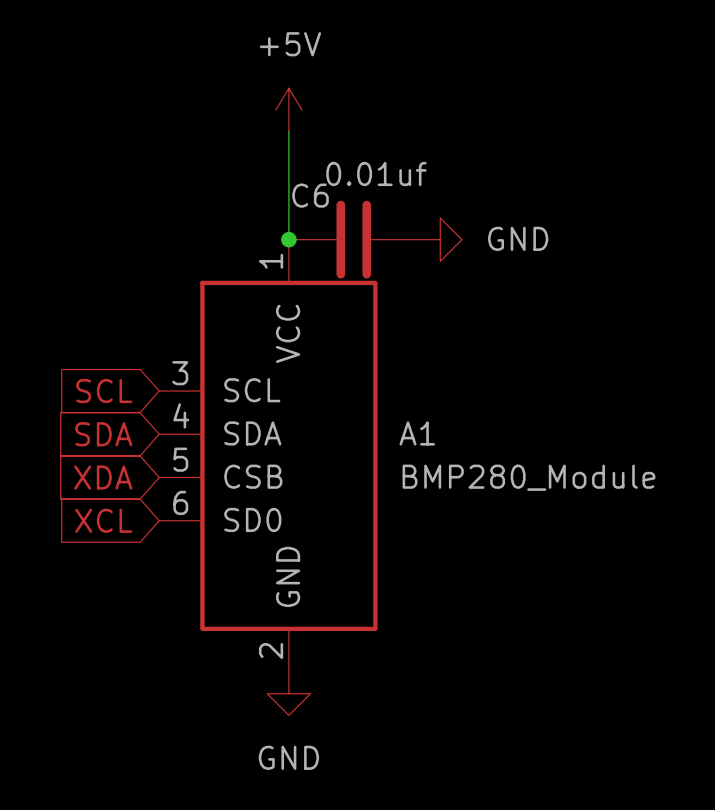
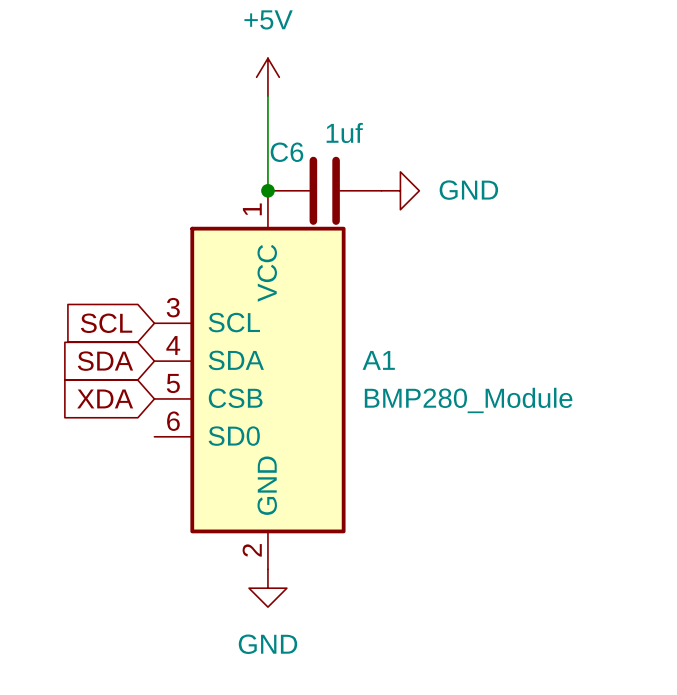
C6 value: 0.01uf (376, 173) -> 1uf (344, 132)
global label: XCL (103, 520) -> none

